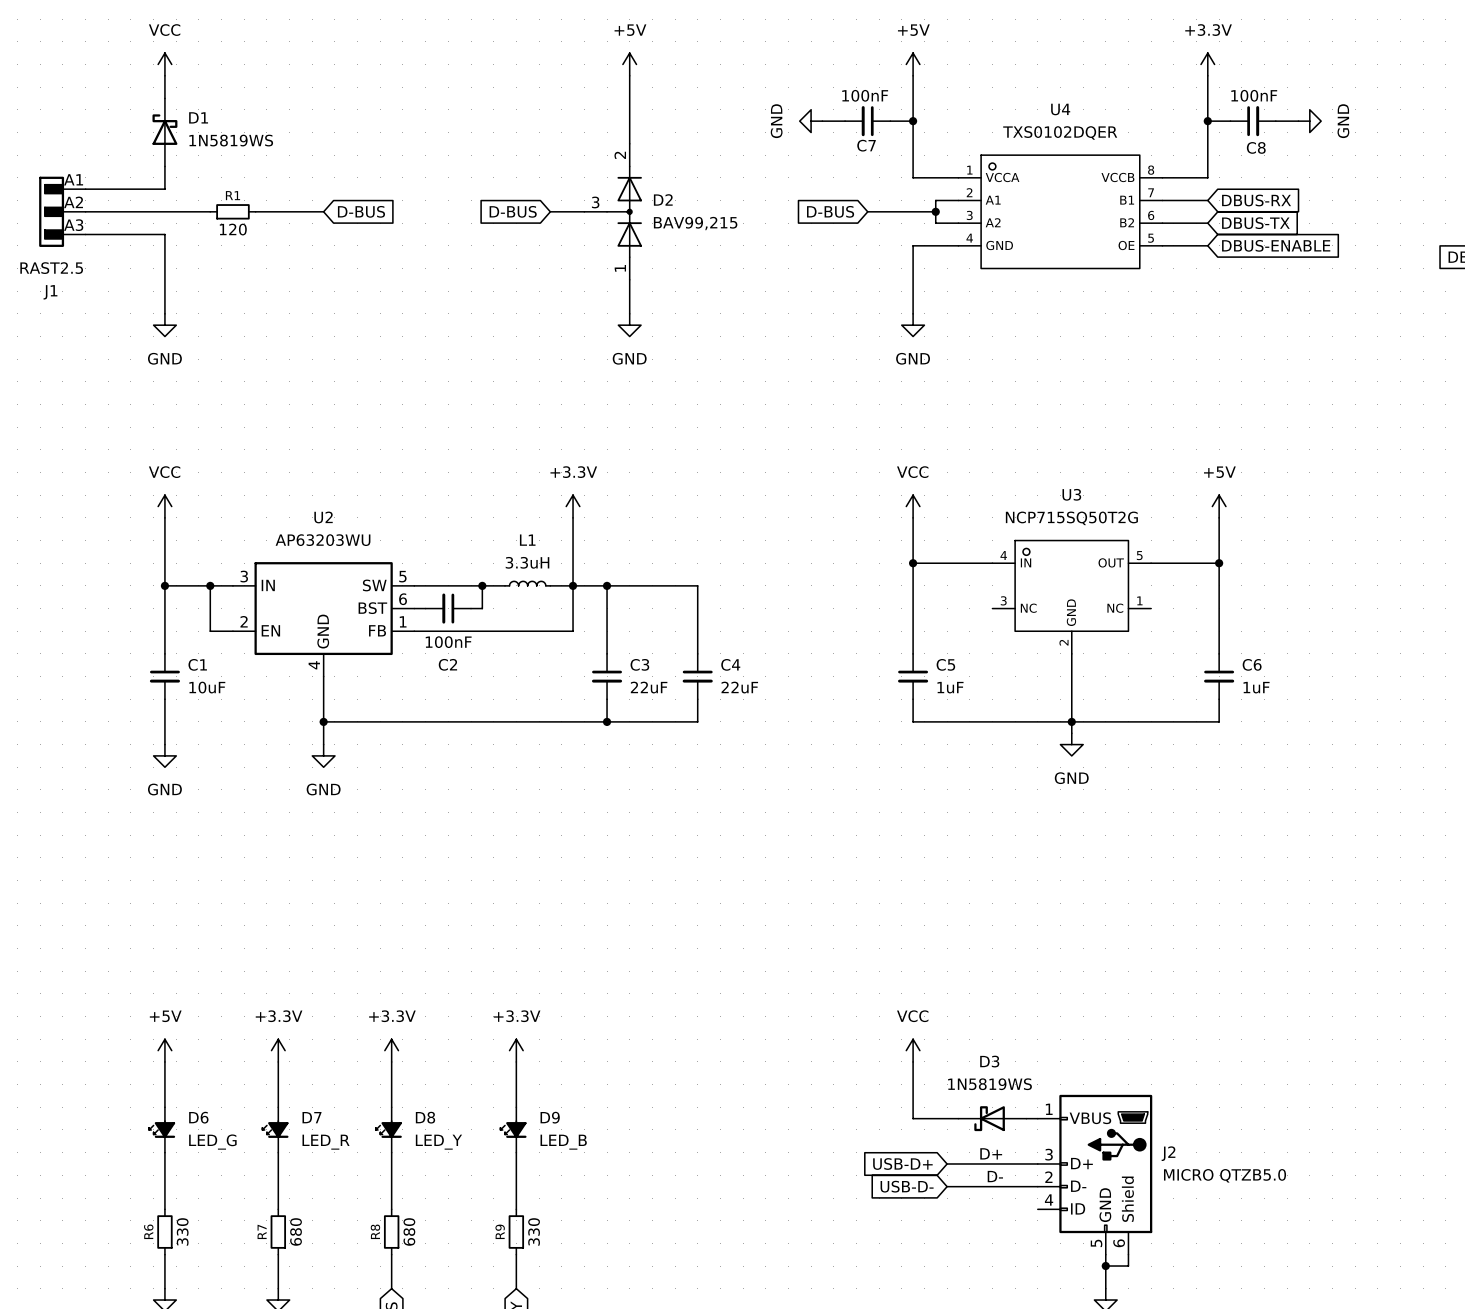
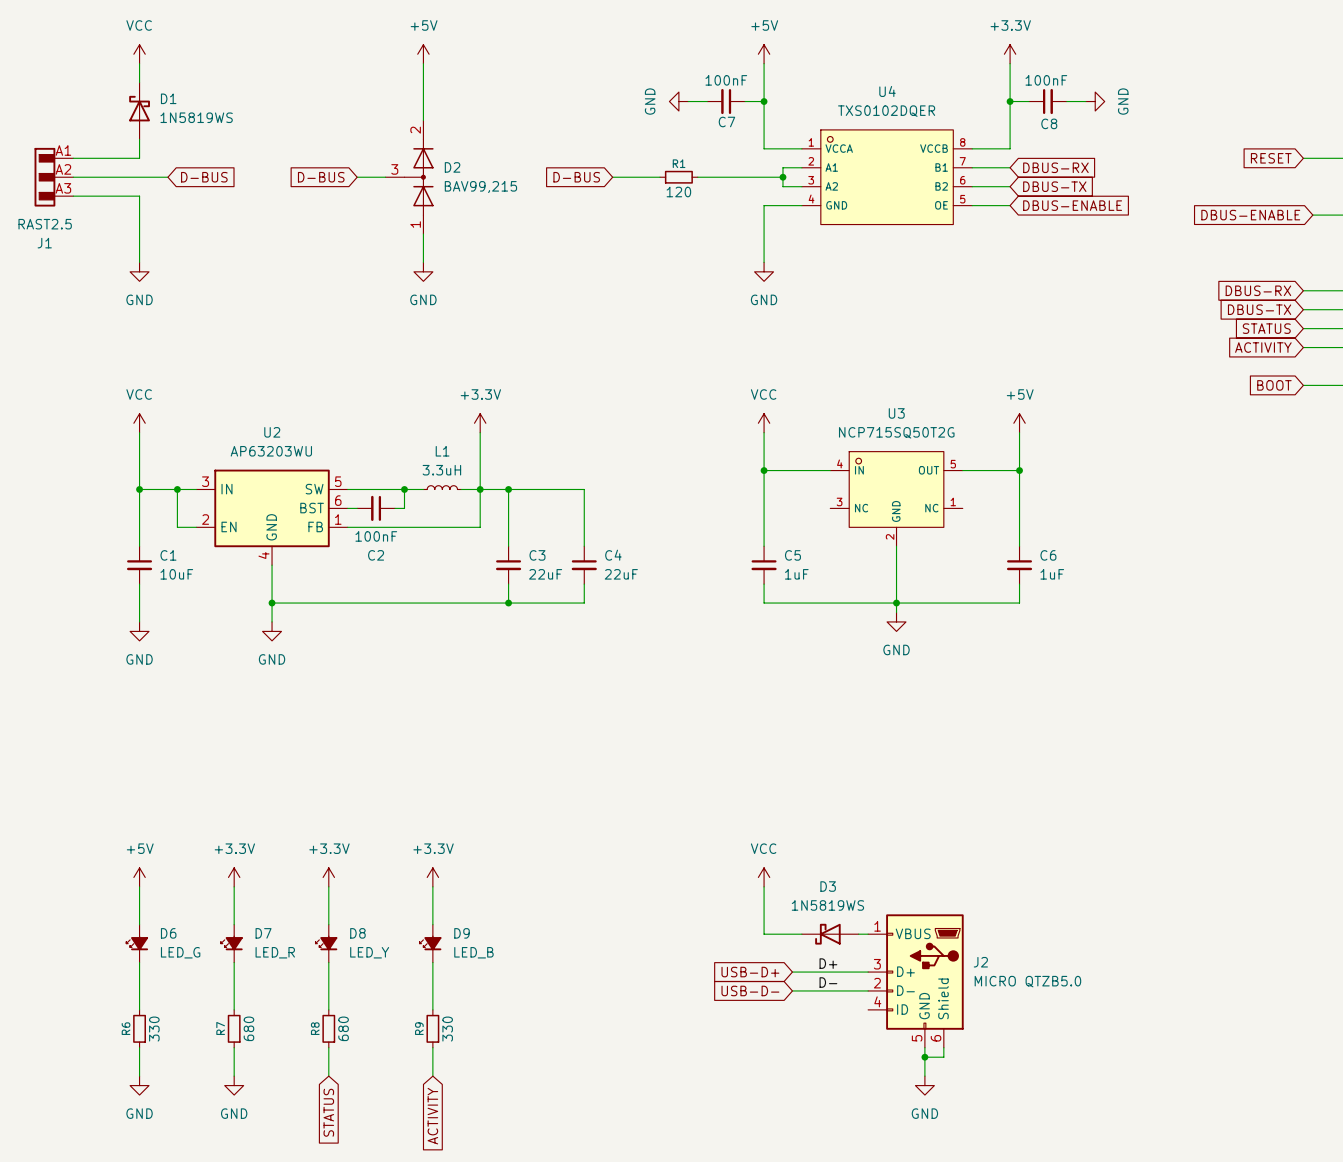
power symbol position: +5V (629, 64) -> +5V (423, 54)
wire: (629, 75) (629, 143) -> (423, 63) (423, 120)
wire: (198, 211) (210, 211) -> none
R1 position: (232, 211) -> (678, 177)
global label: none -> D-BUS (204, 177)
wire: (255, 211) (323, 211) -> none
global label rotation: 0° (361, 211) -> 180° (321, 177)
global label: D-BUS (513, 211) -> none
wire: (550, 211) (584, 211) -> (357, 177) (385, 177)
D2 position: (613, 211) -> (409, 177)
global label: none -> D-BUS (576, 177)
wire: none -> (612, 177) (659, 177)
global label: D-BUS (830, 211) -> none
wire: none -> (697, 177) (726, 177)
wire: (629, 279) (629, 313) -> (423, 234) (423, 262)
power symbol position: GND (629, 325) -> GND (423, 271)

